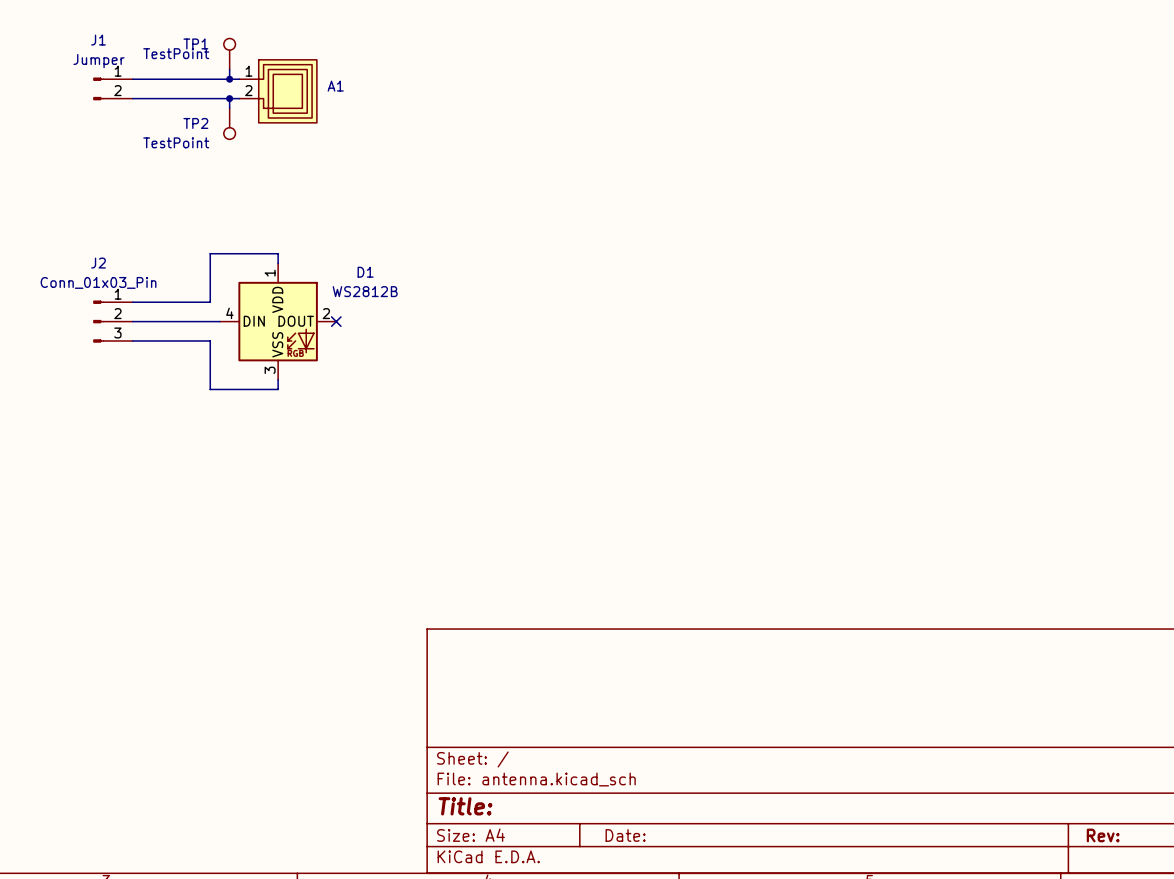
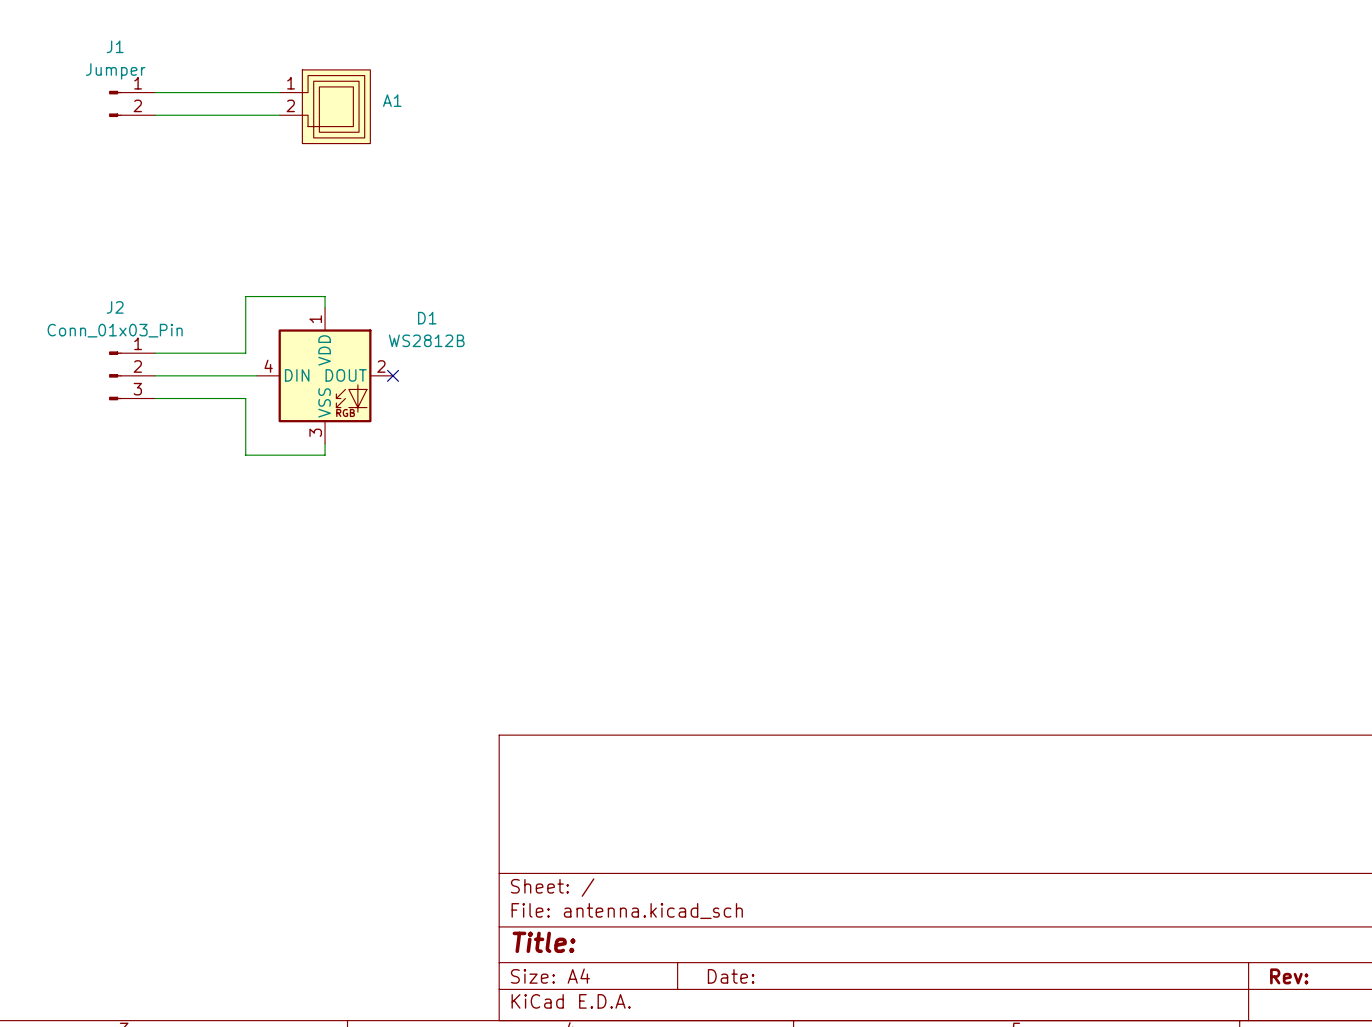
TP1: TestPoint (229, 54) -> none
wire: (229, 69) (229, 79) -> none
junction: (229, 79) -> none
wire: (229, 98) (229, 108) -> none
junction: (229, 98) -> none
TP2: TestPoint (229, 123) -> none

